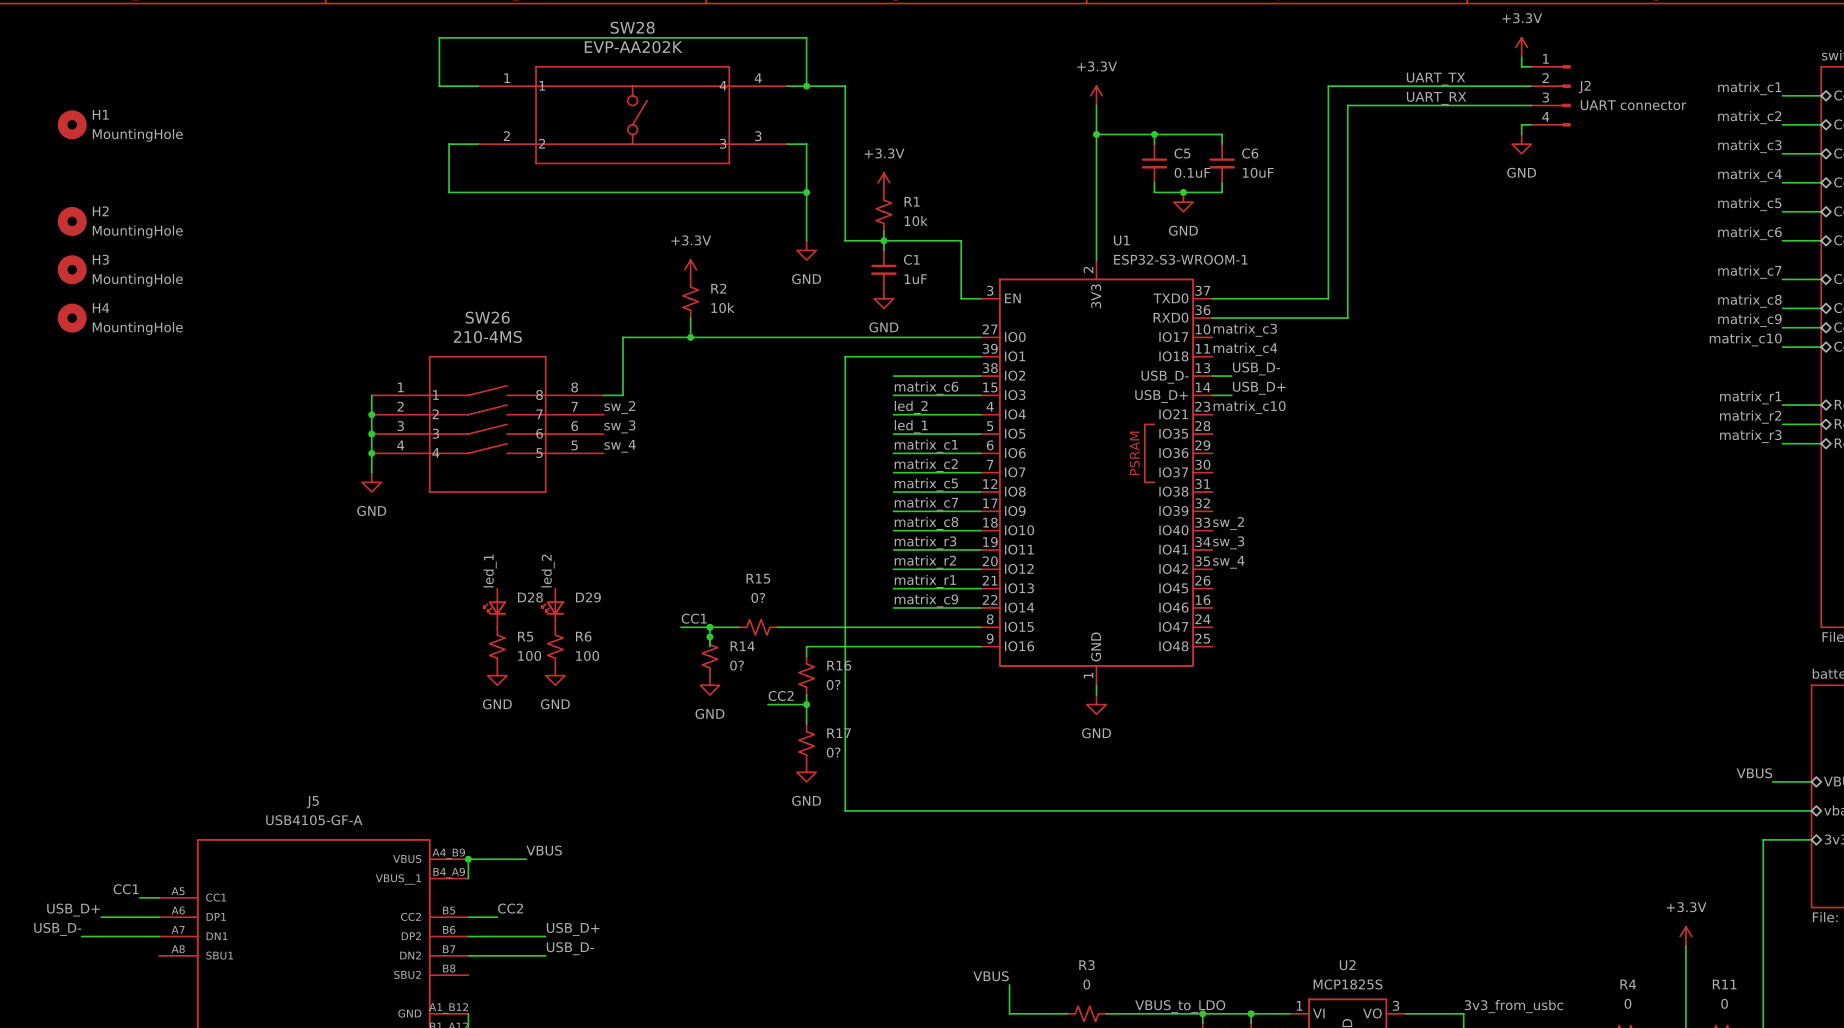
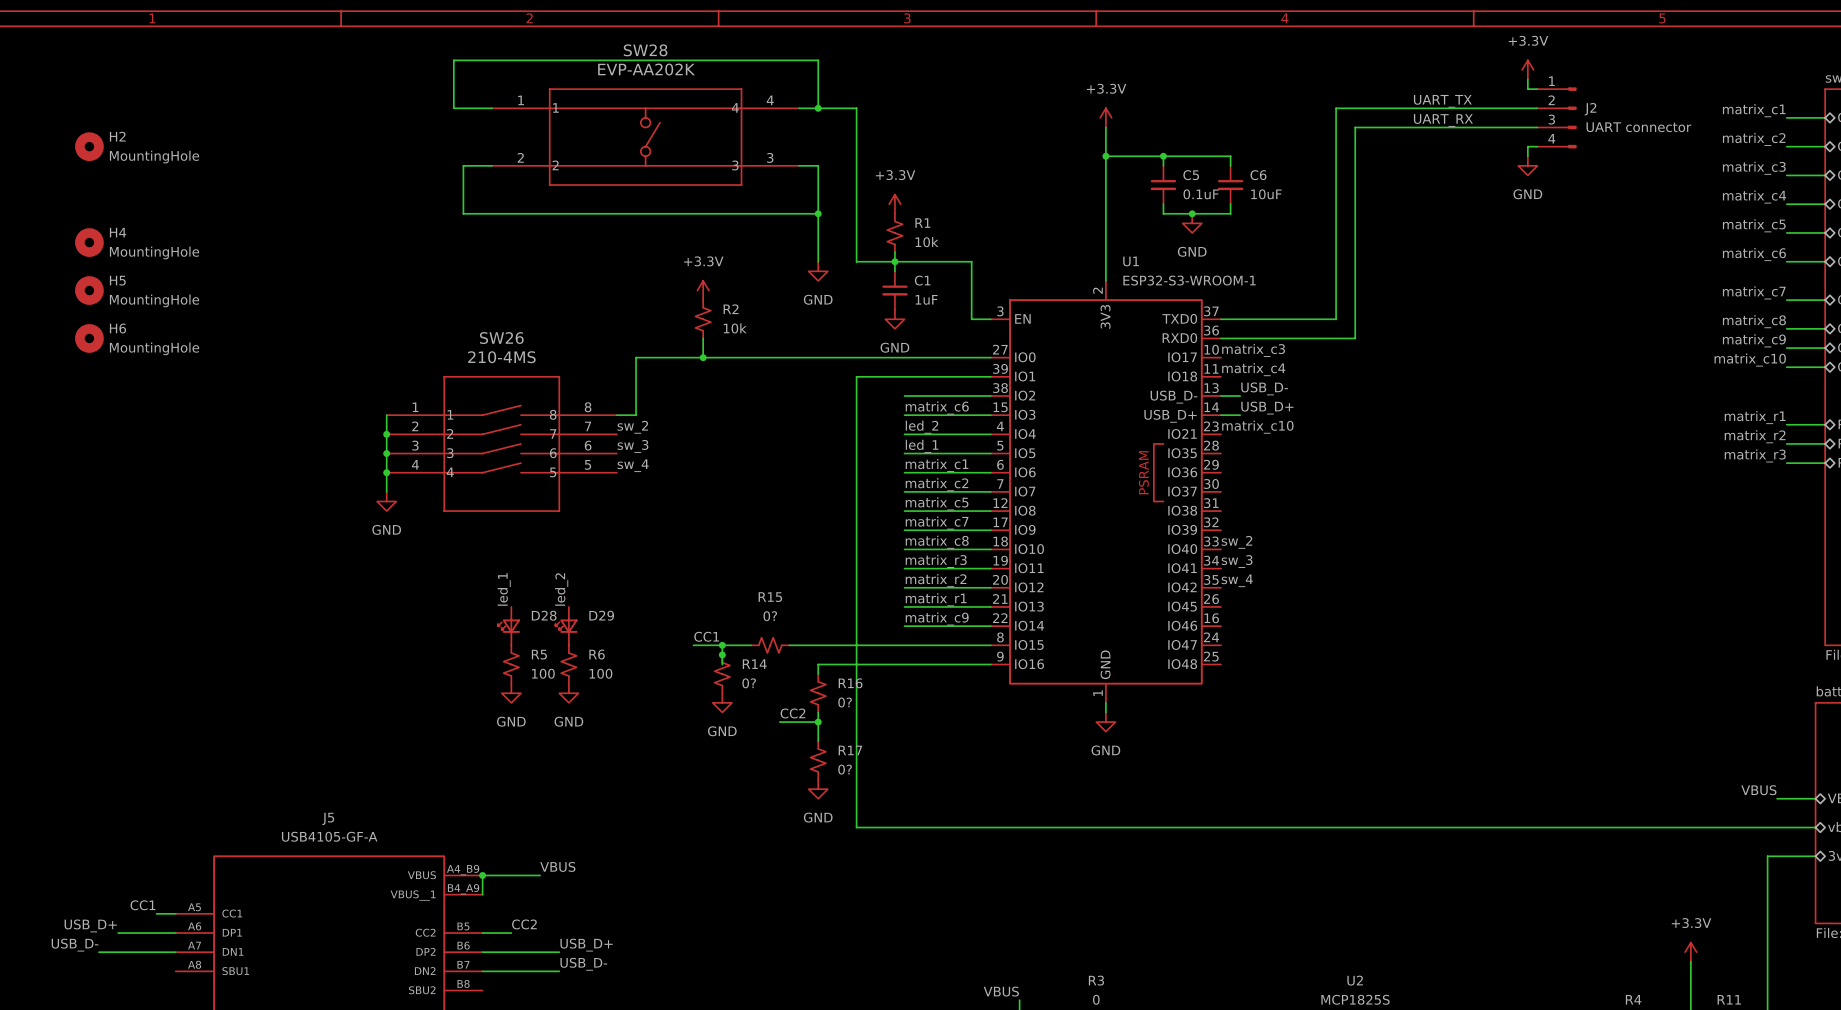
H1 name: H1 (100, 114) -> H2 (117, 136)
H2 name: H2 (100, 211) -> H4 (118, 232)
H3 name: H3 (100, 259) -> H5 (117, 280)
H4 name: H4 (101, 308) -> H6 (117, 328)

